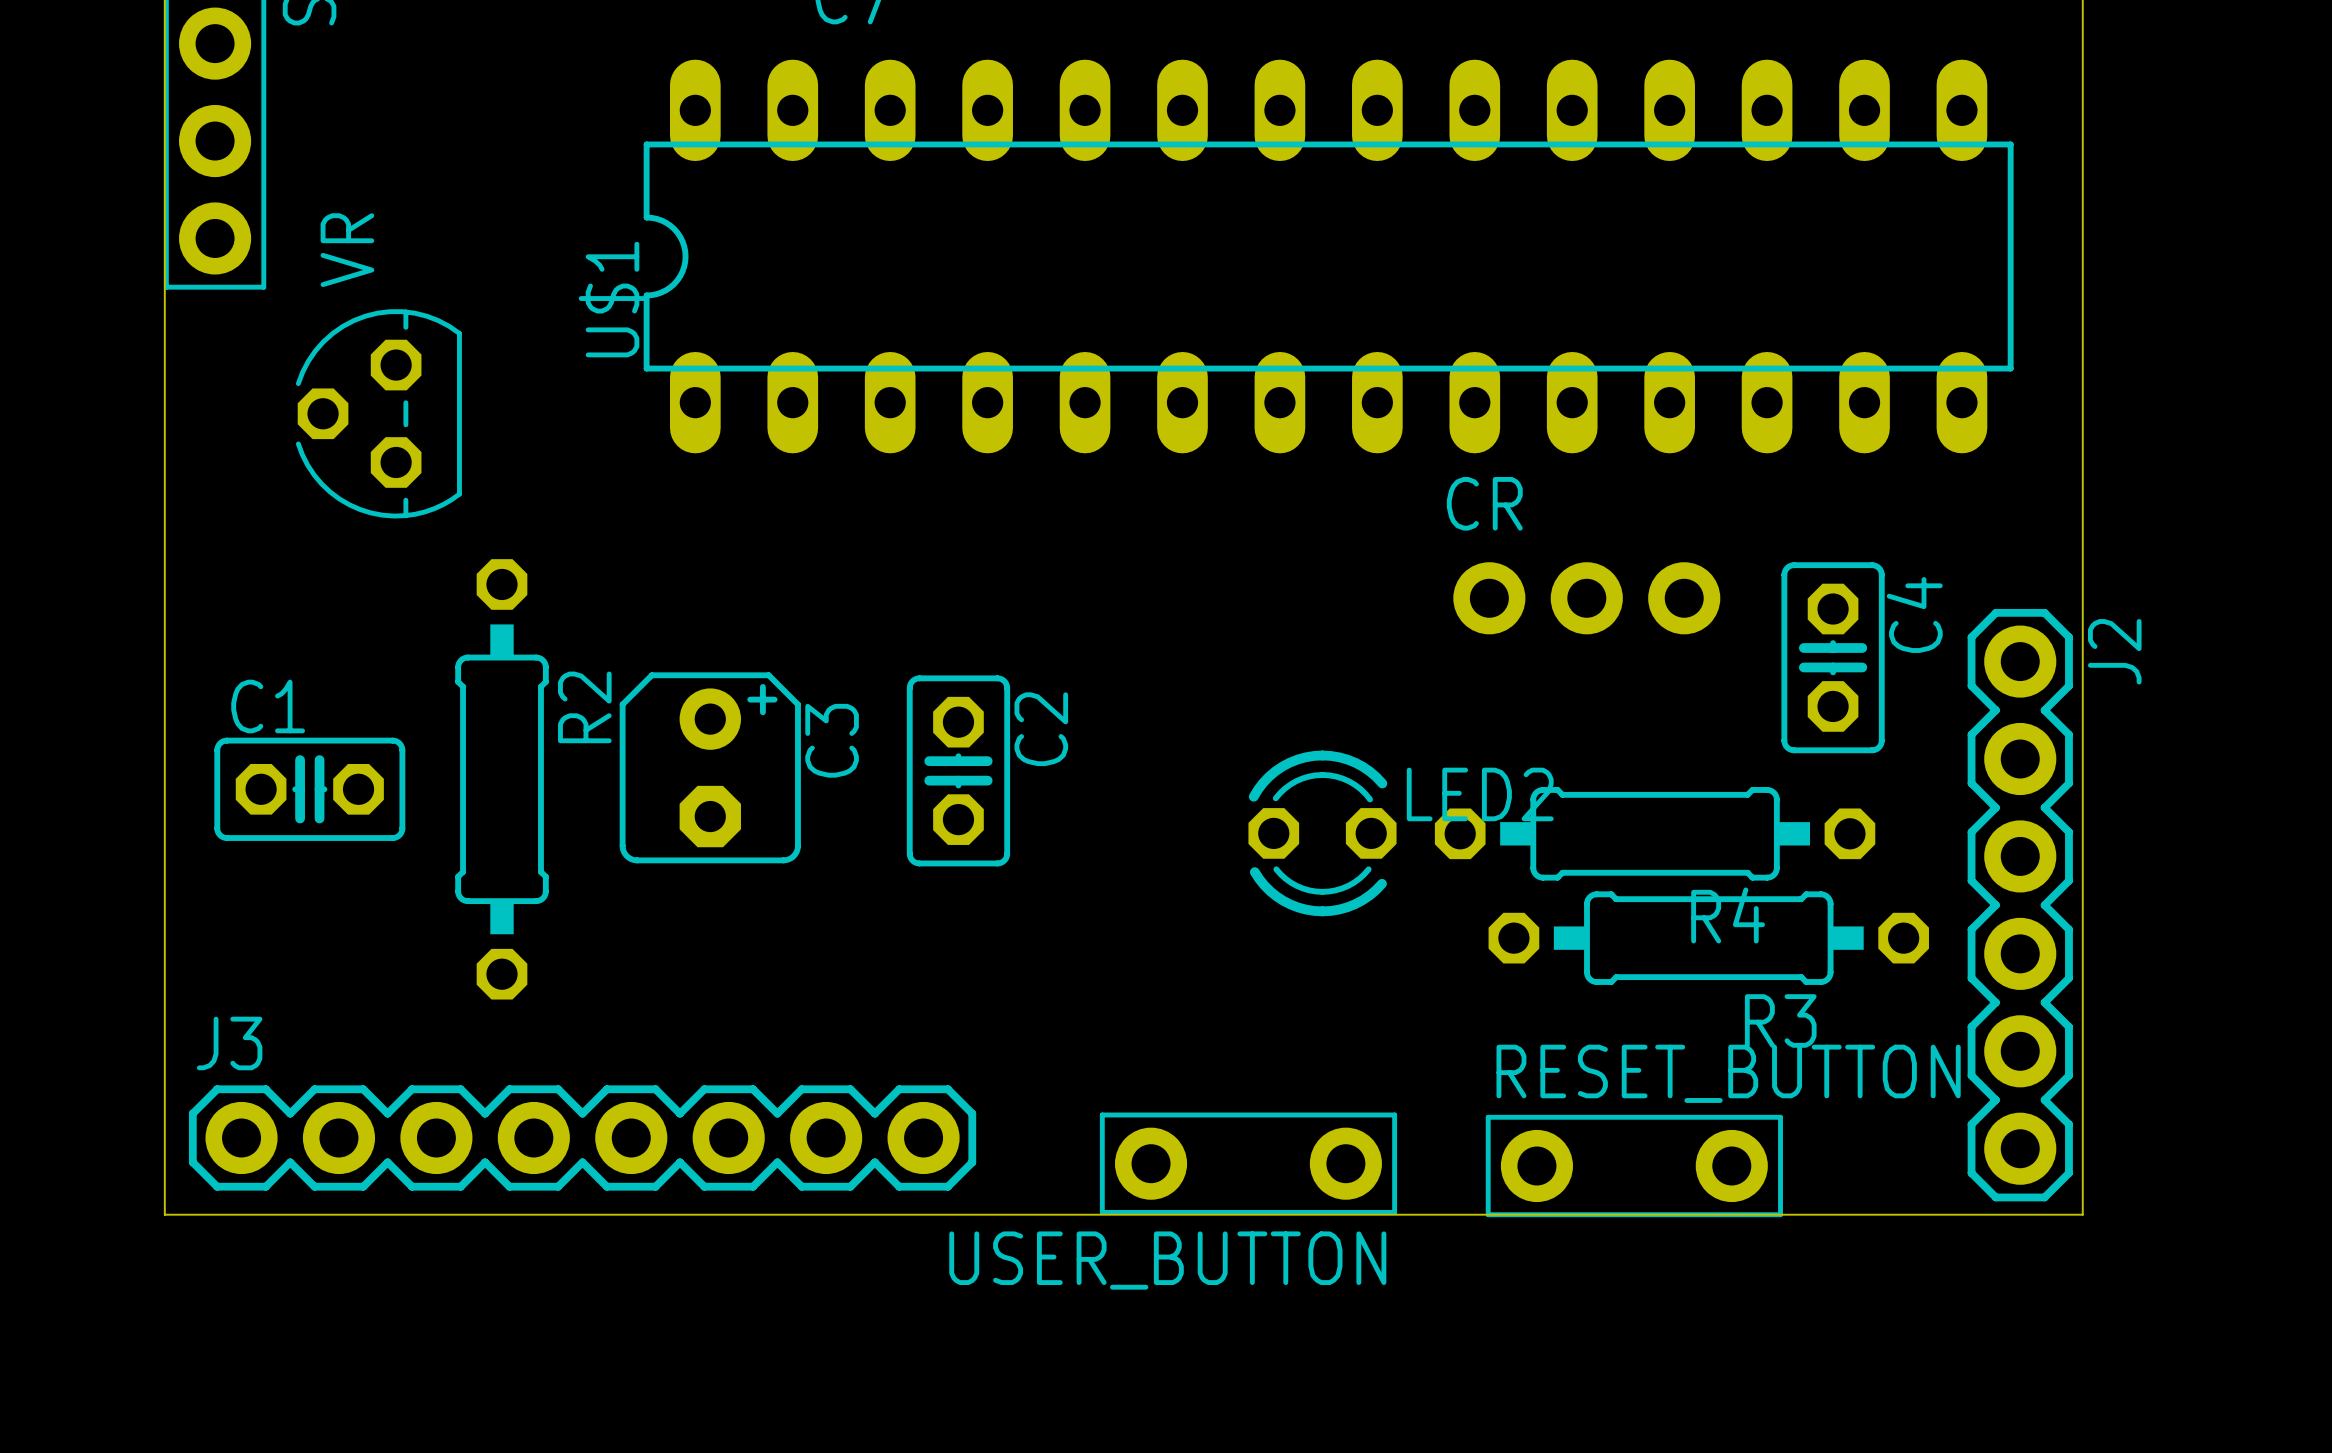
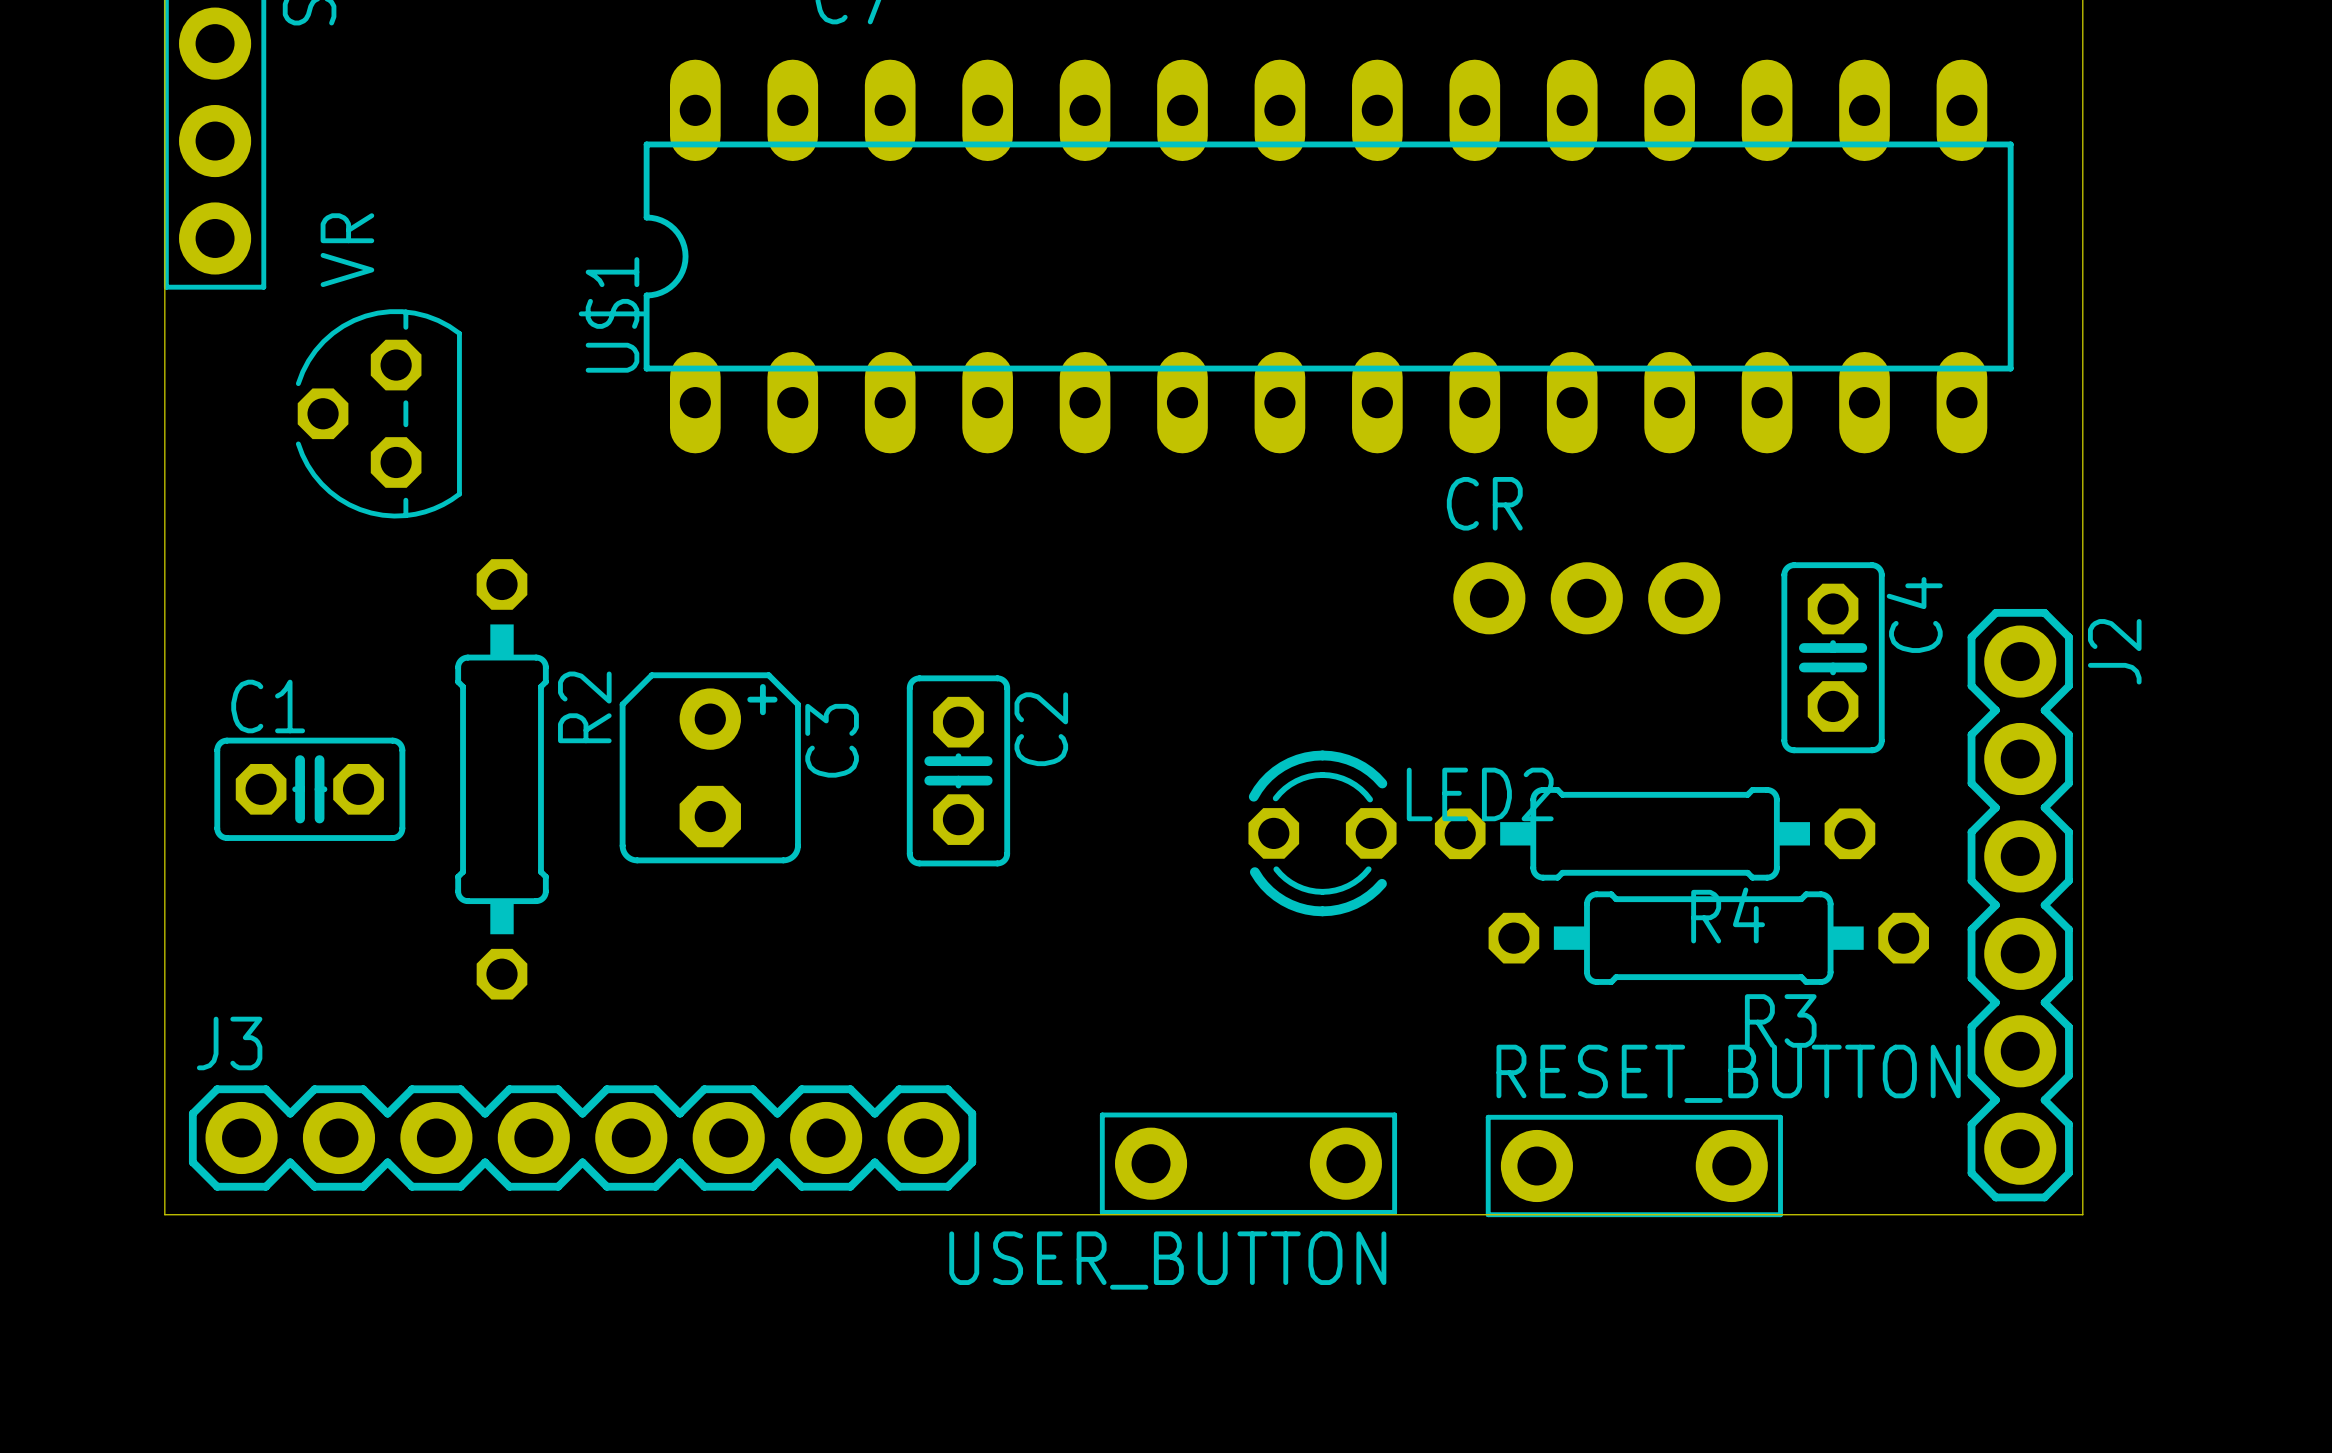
U$1 name position: U$1 (612, 299) -> U$1 (612, 314)

